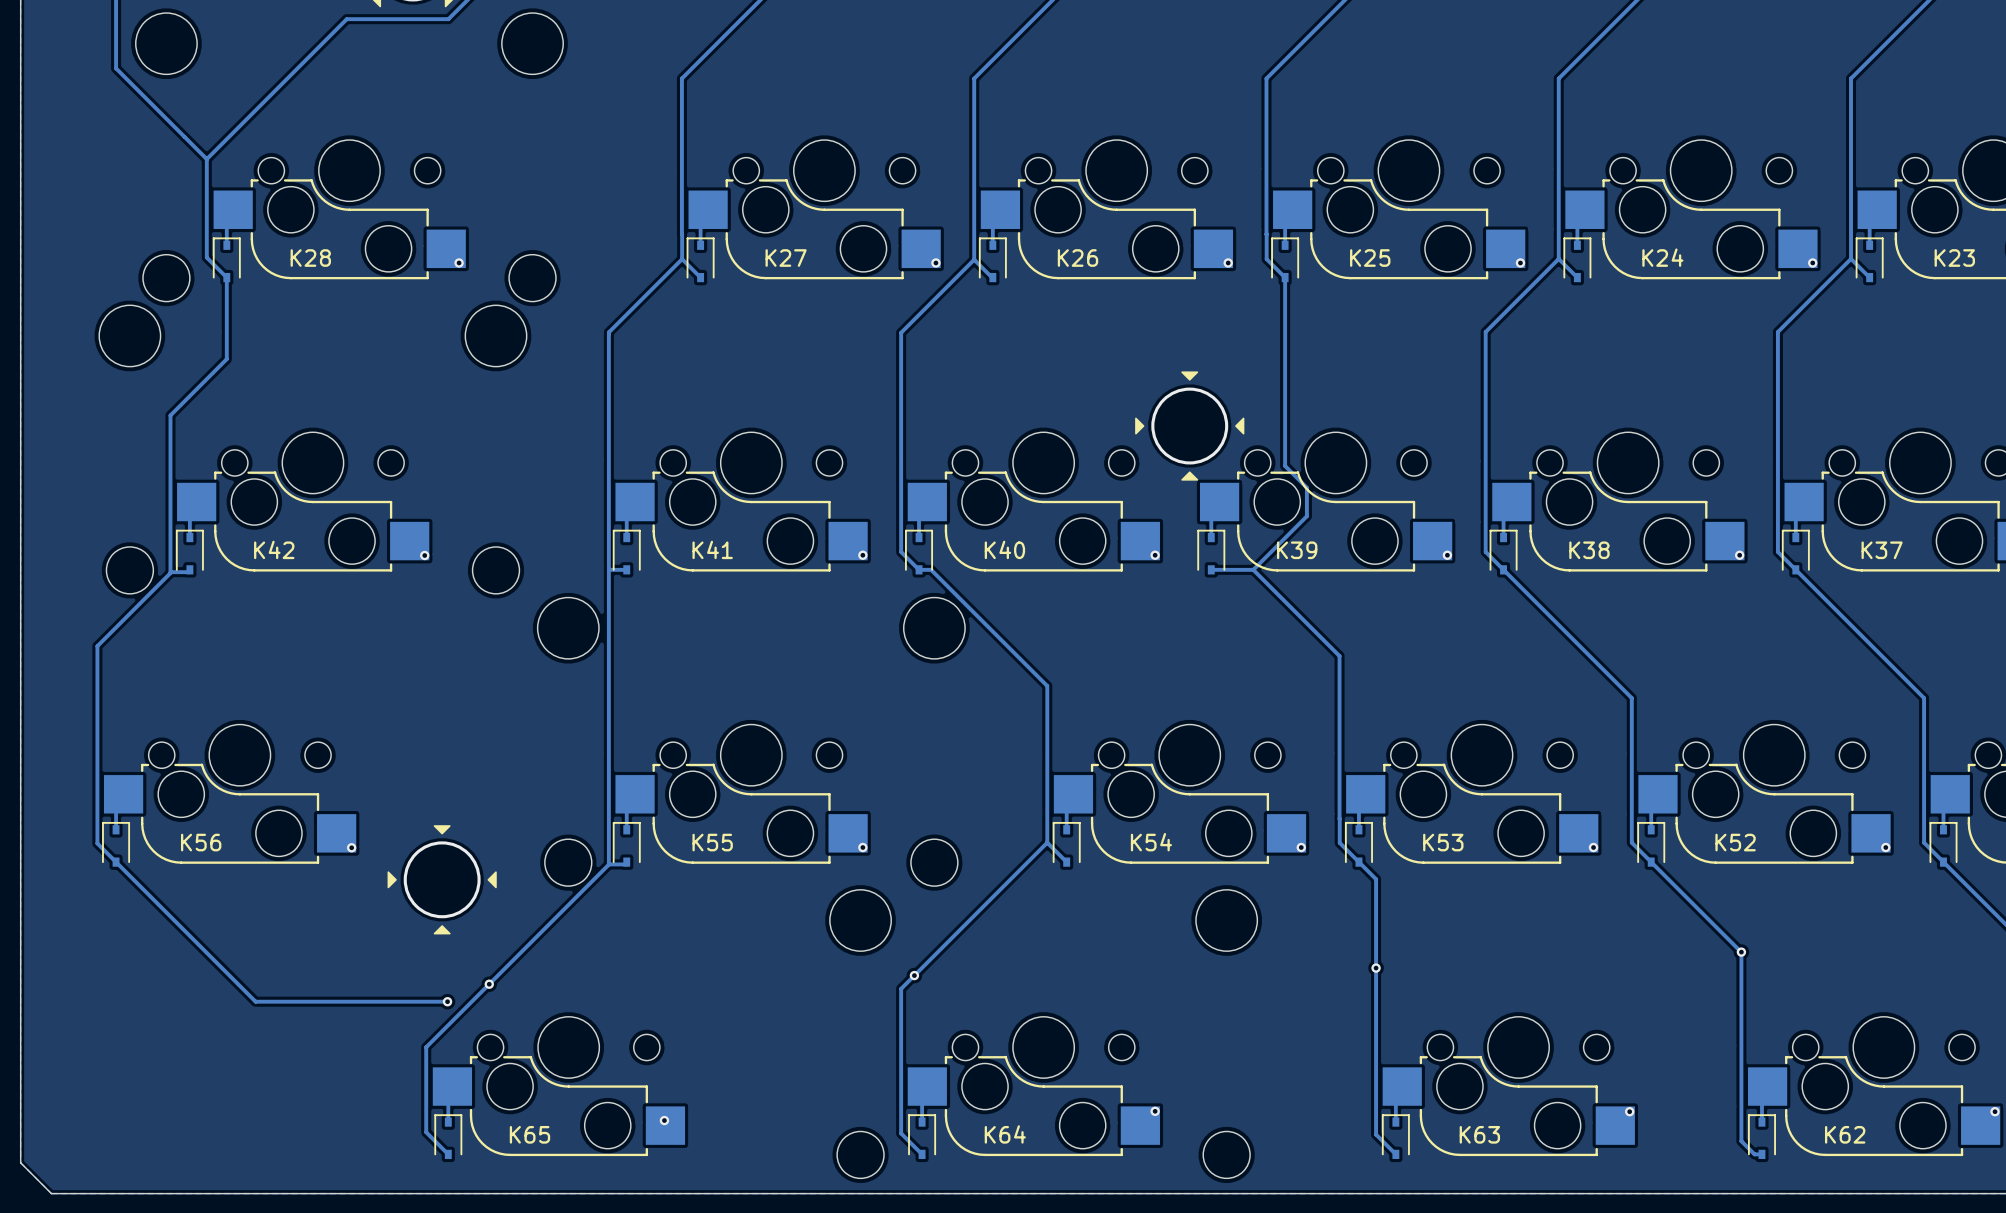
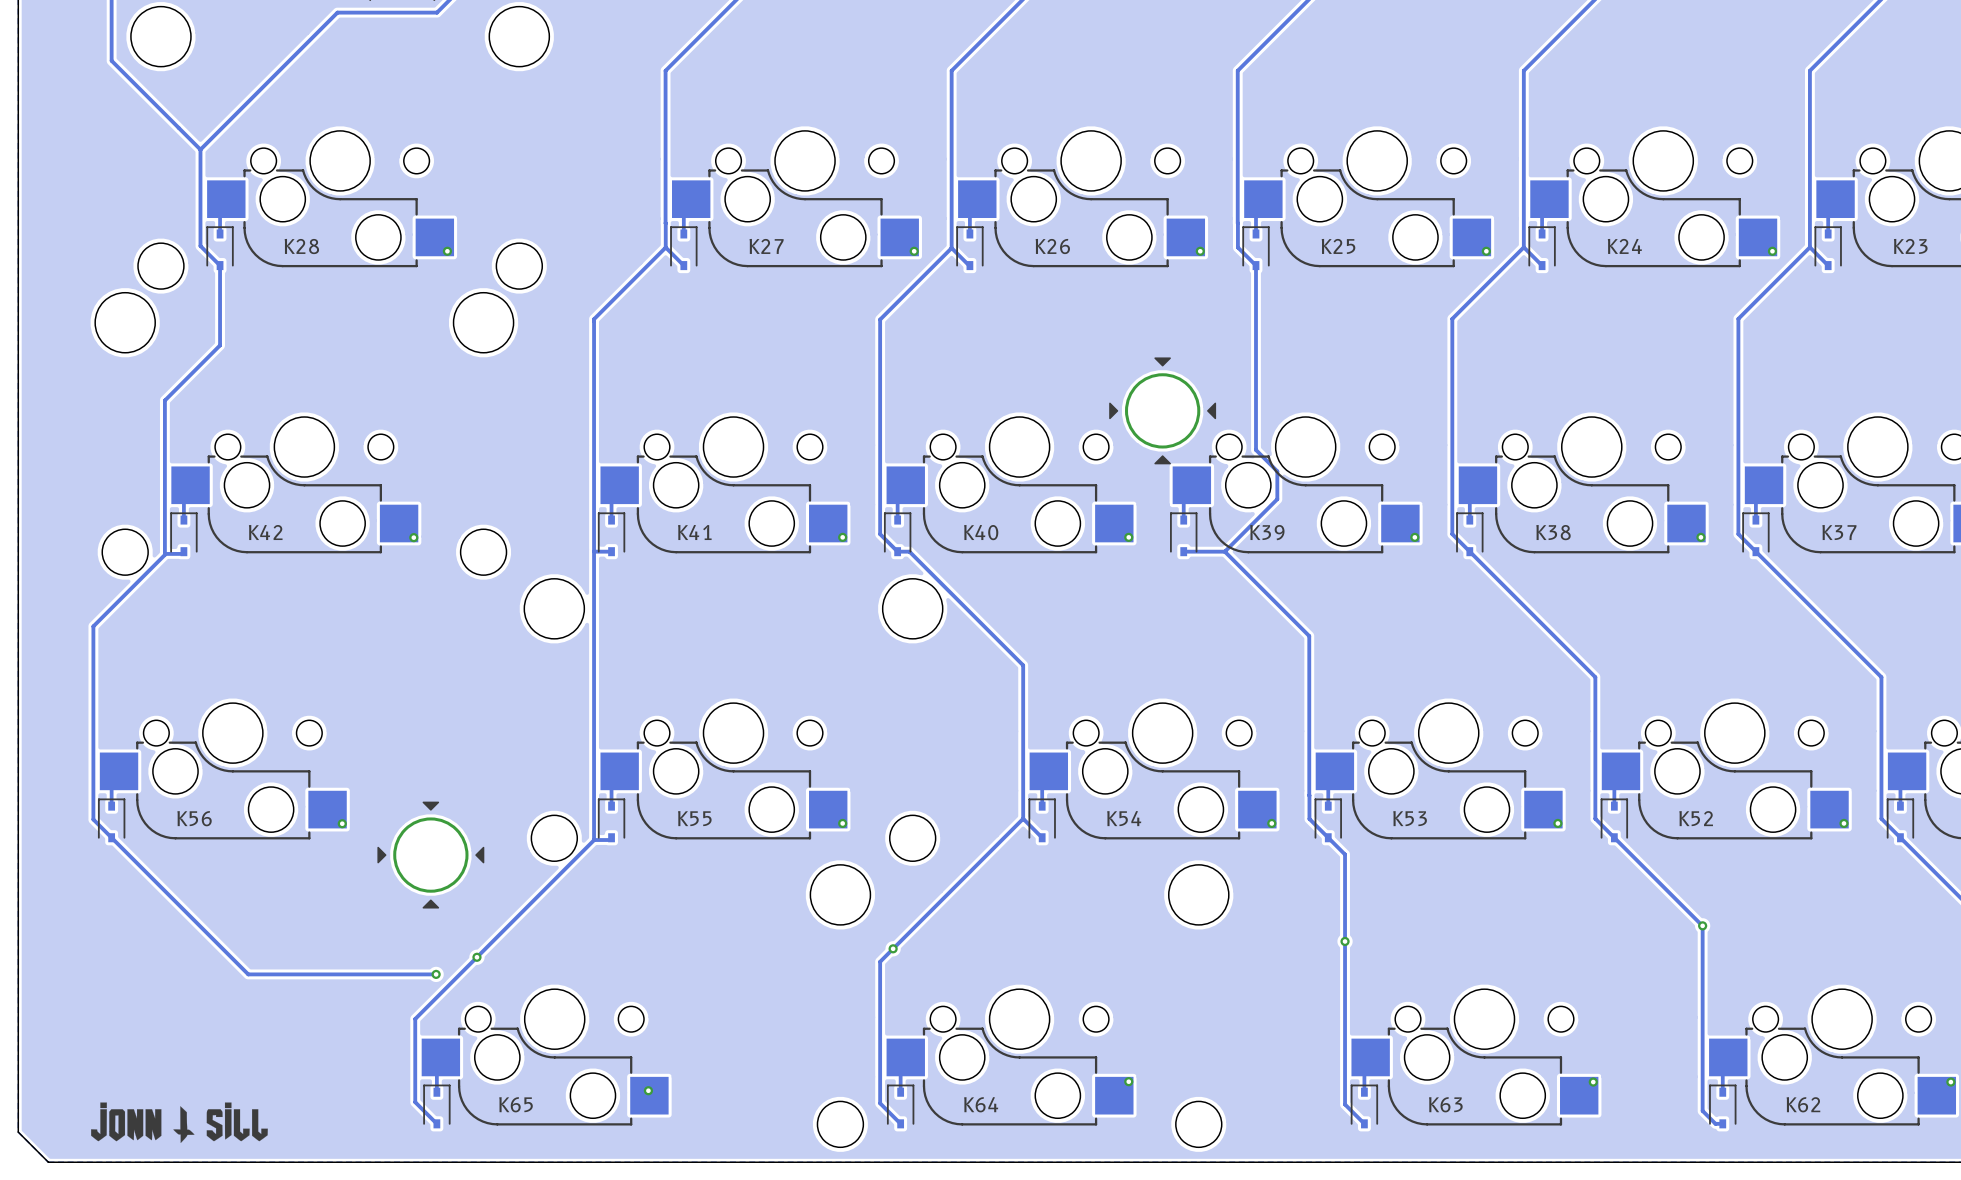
drawing: none -> [91, 1102, 268, 1144]

